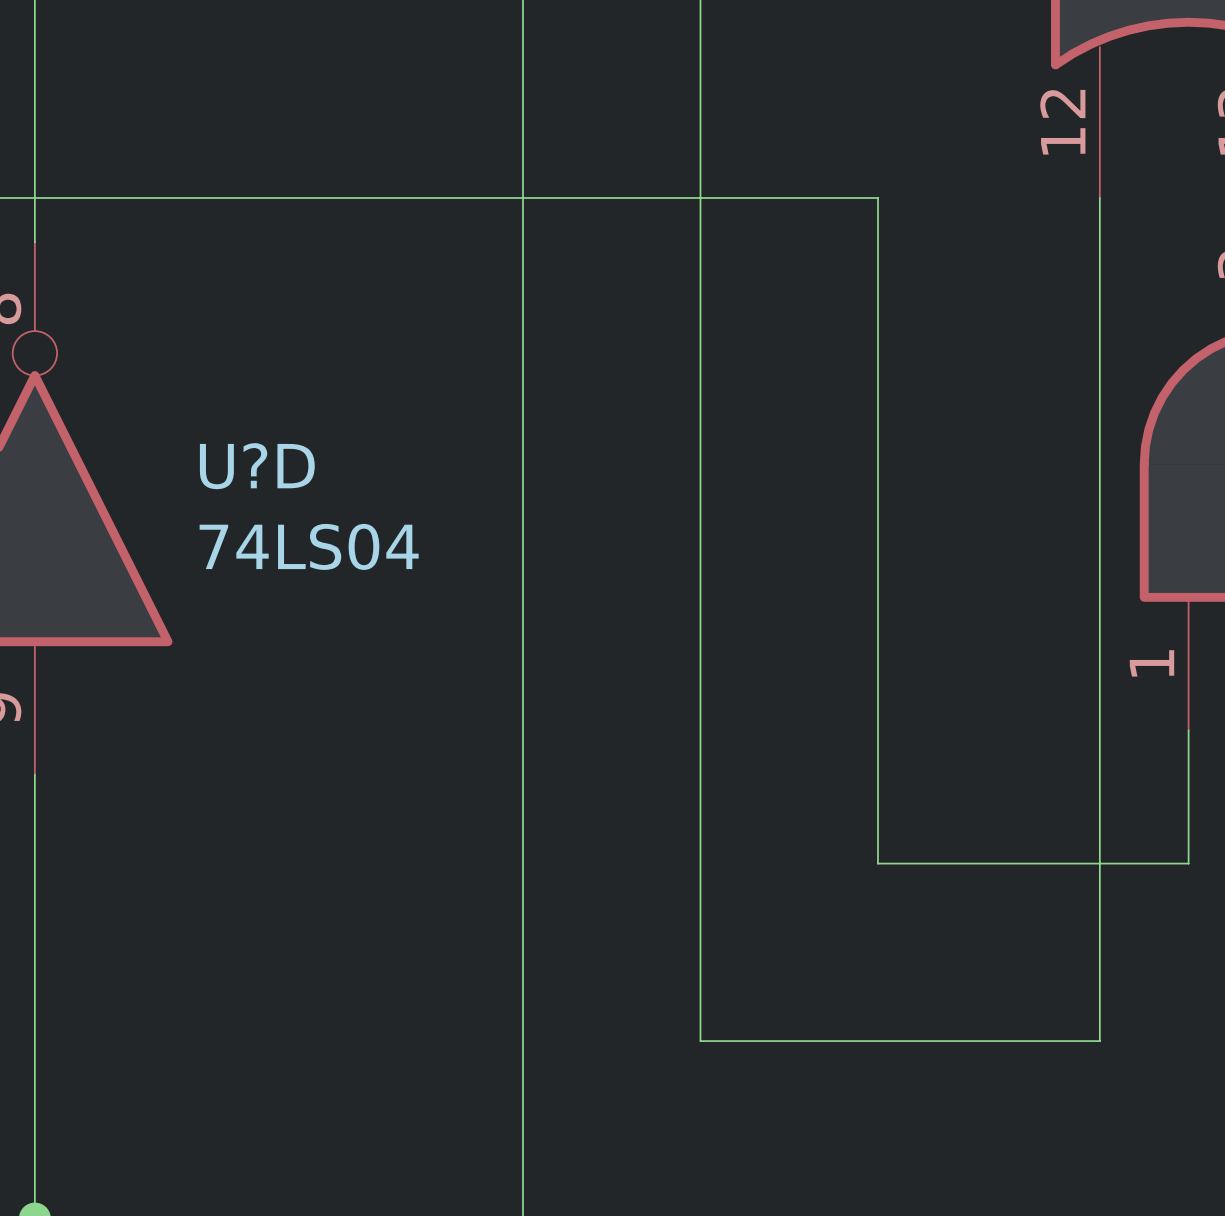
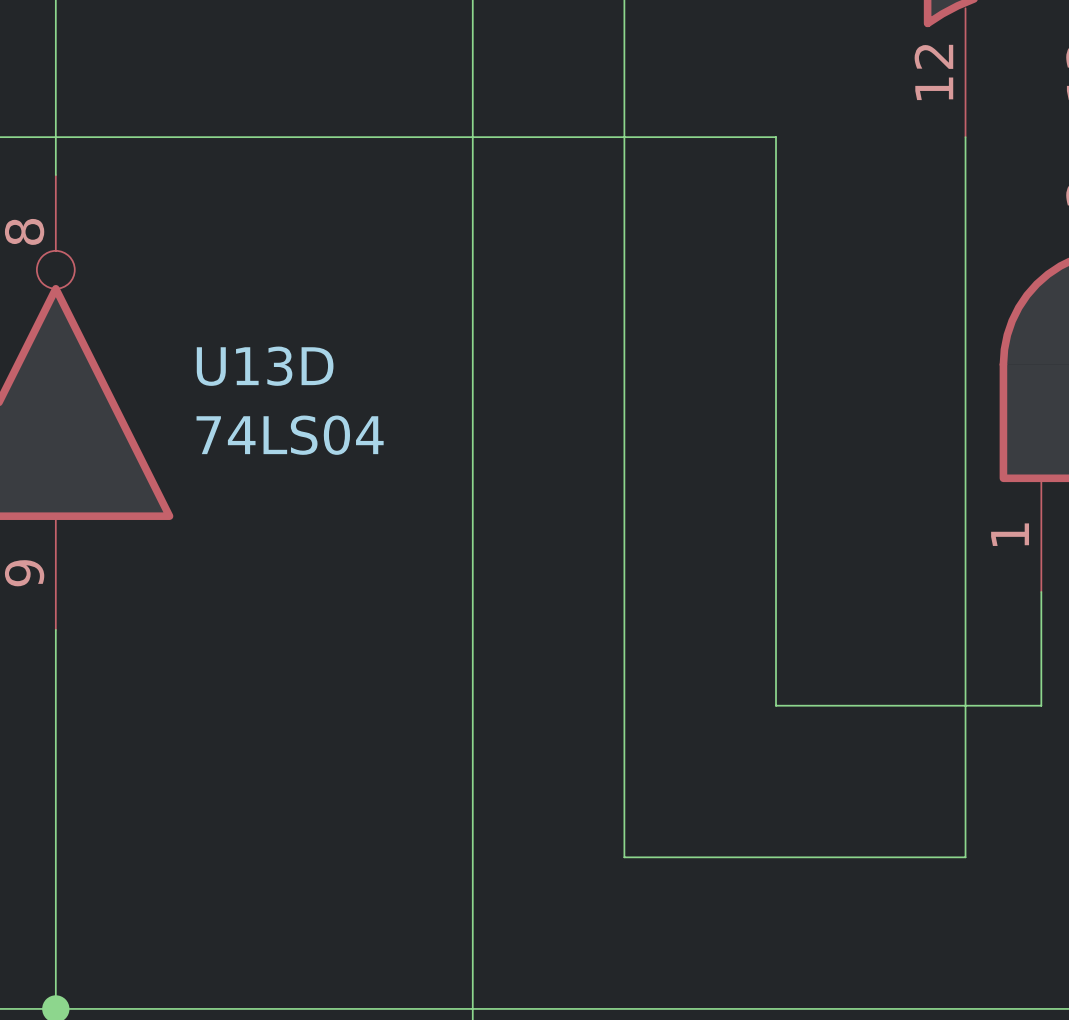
U?D name: U?D (257, 466) -> U13D (265, 366)

